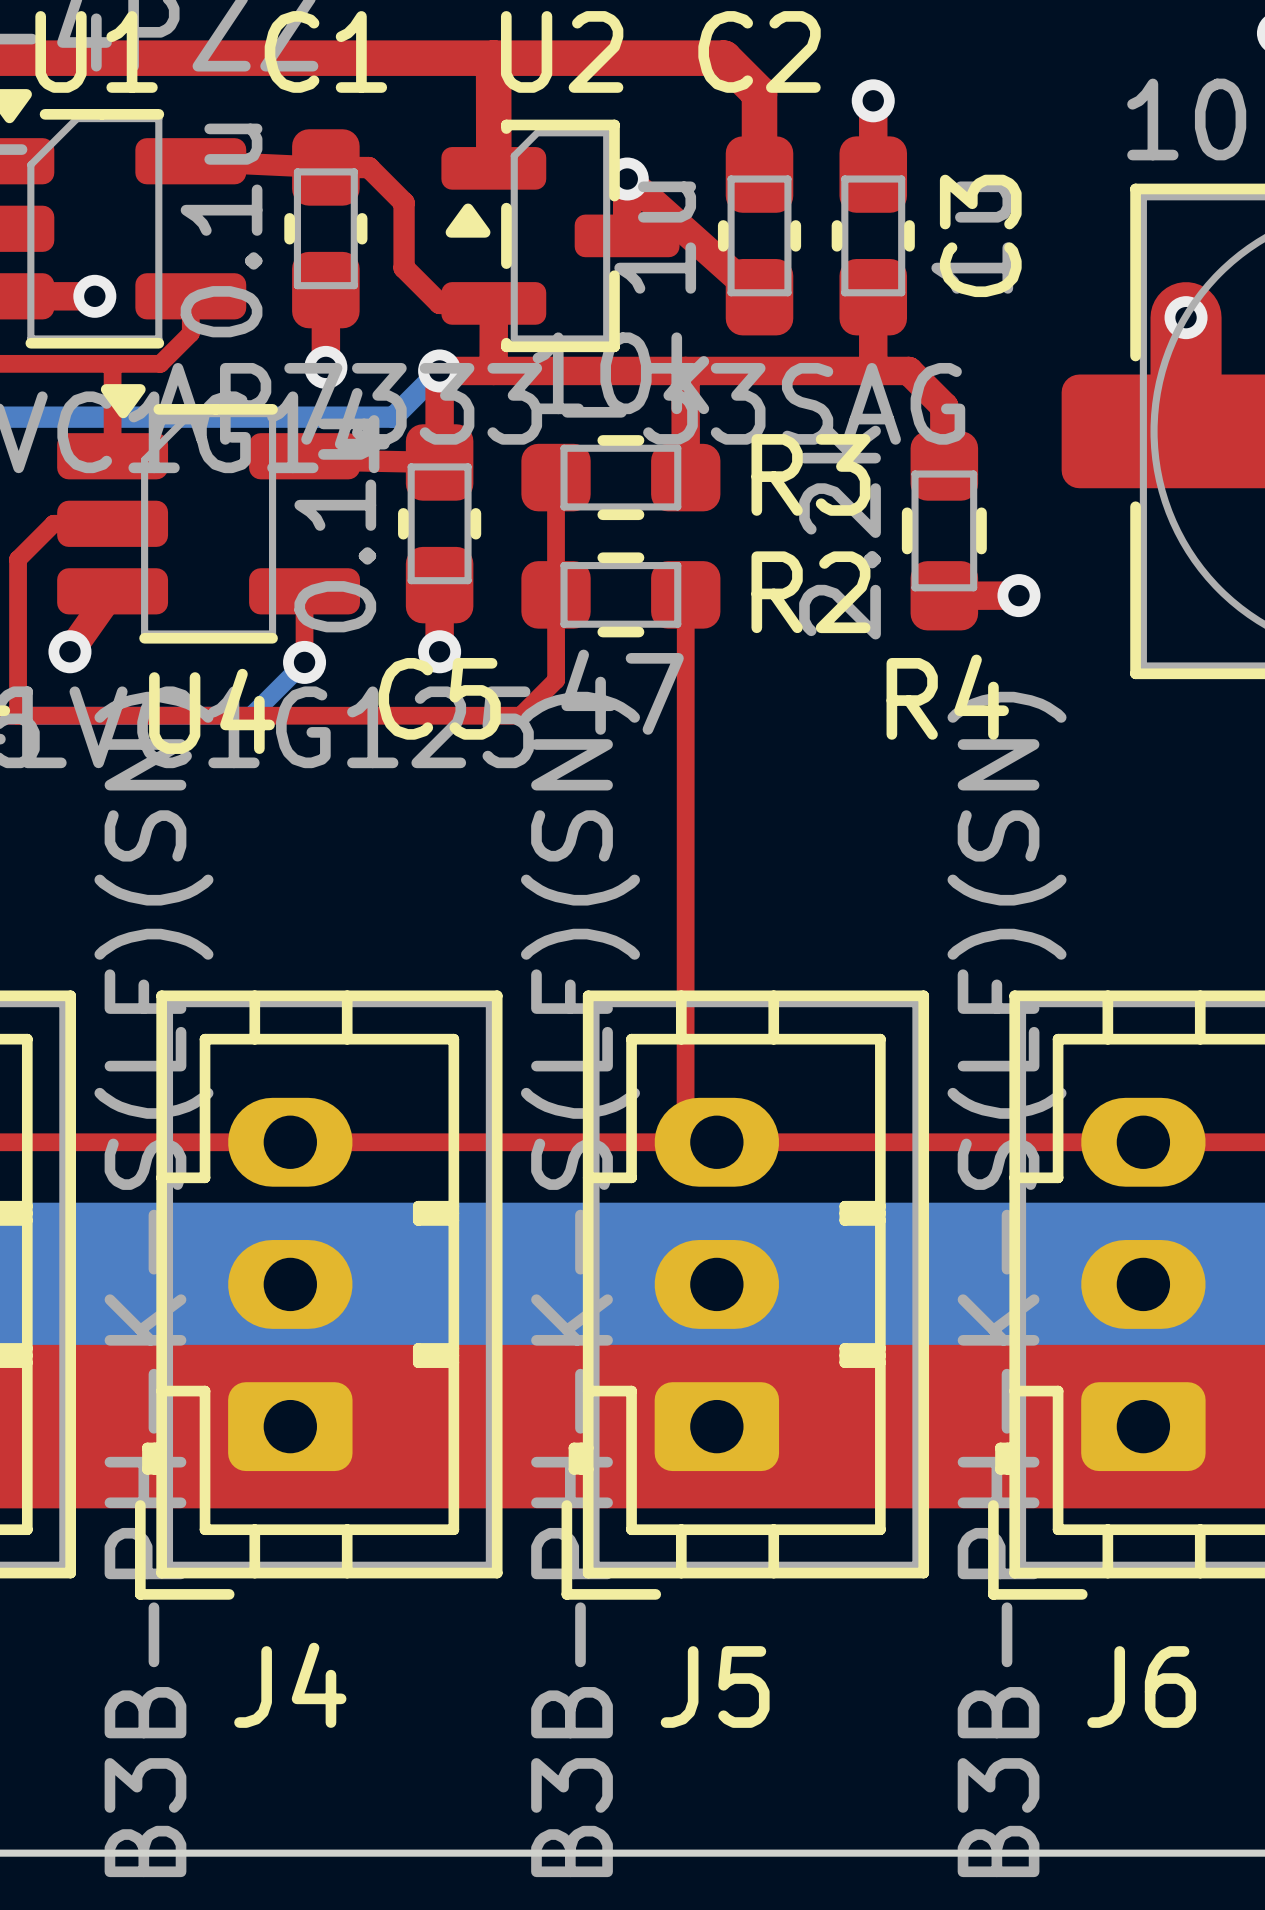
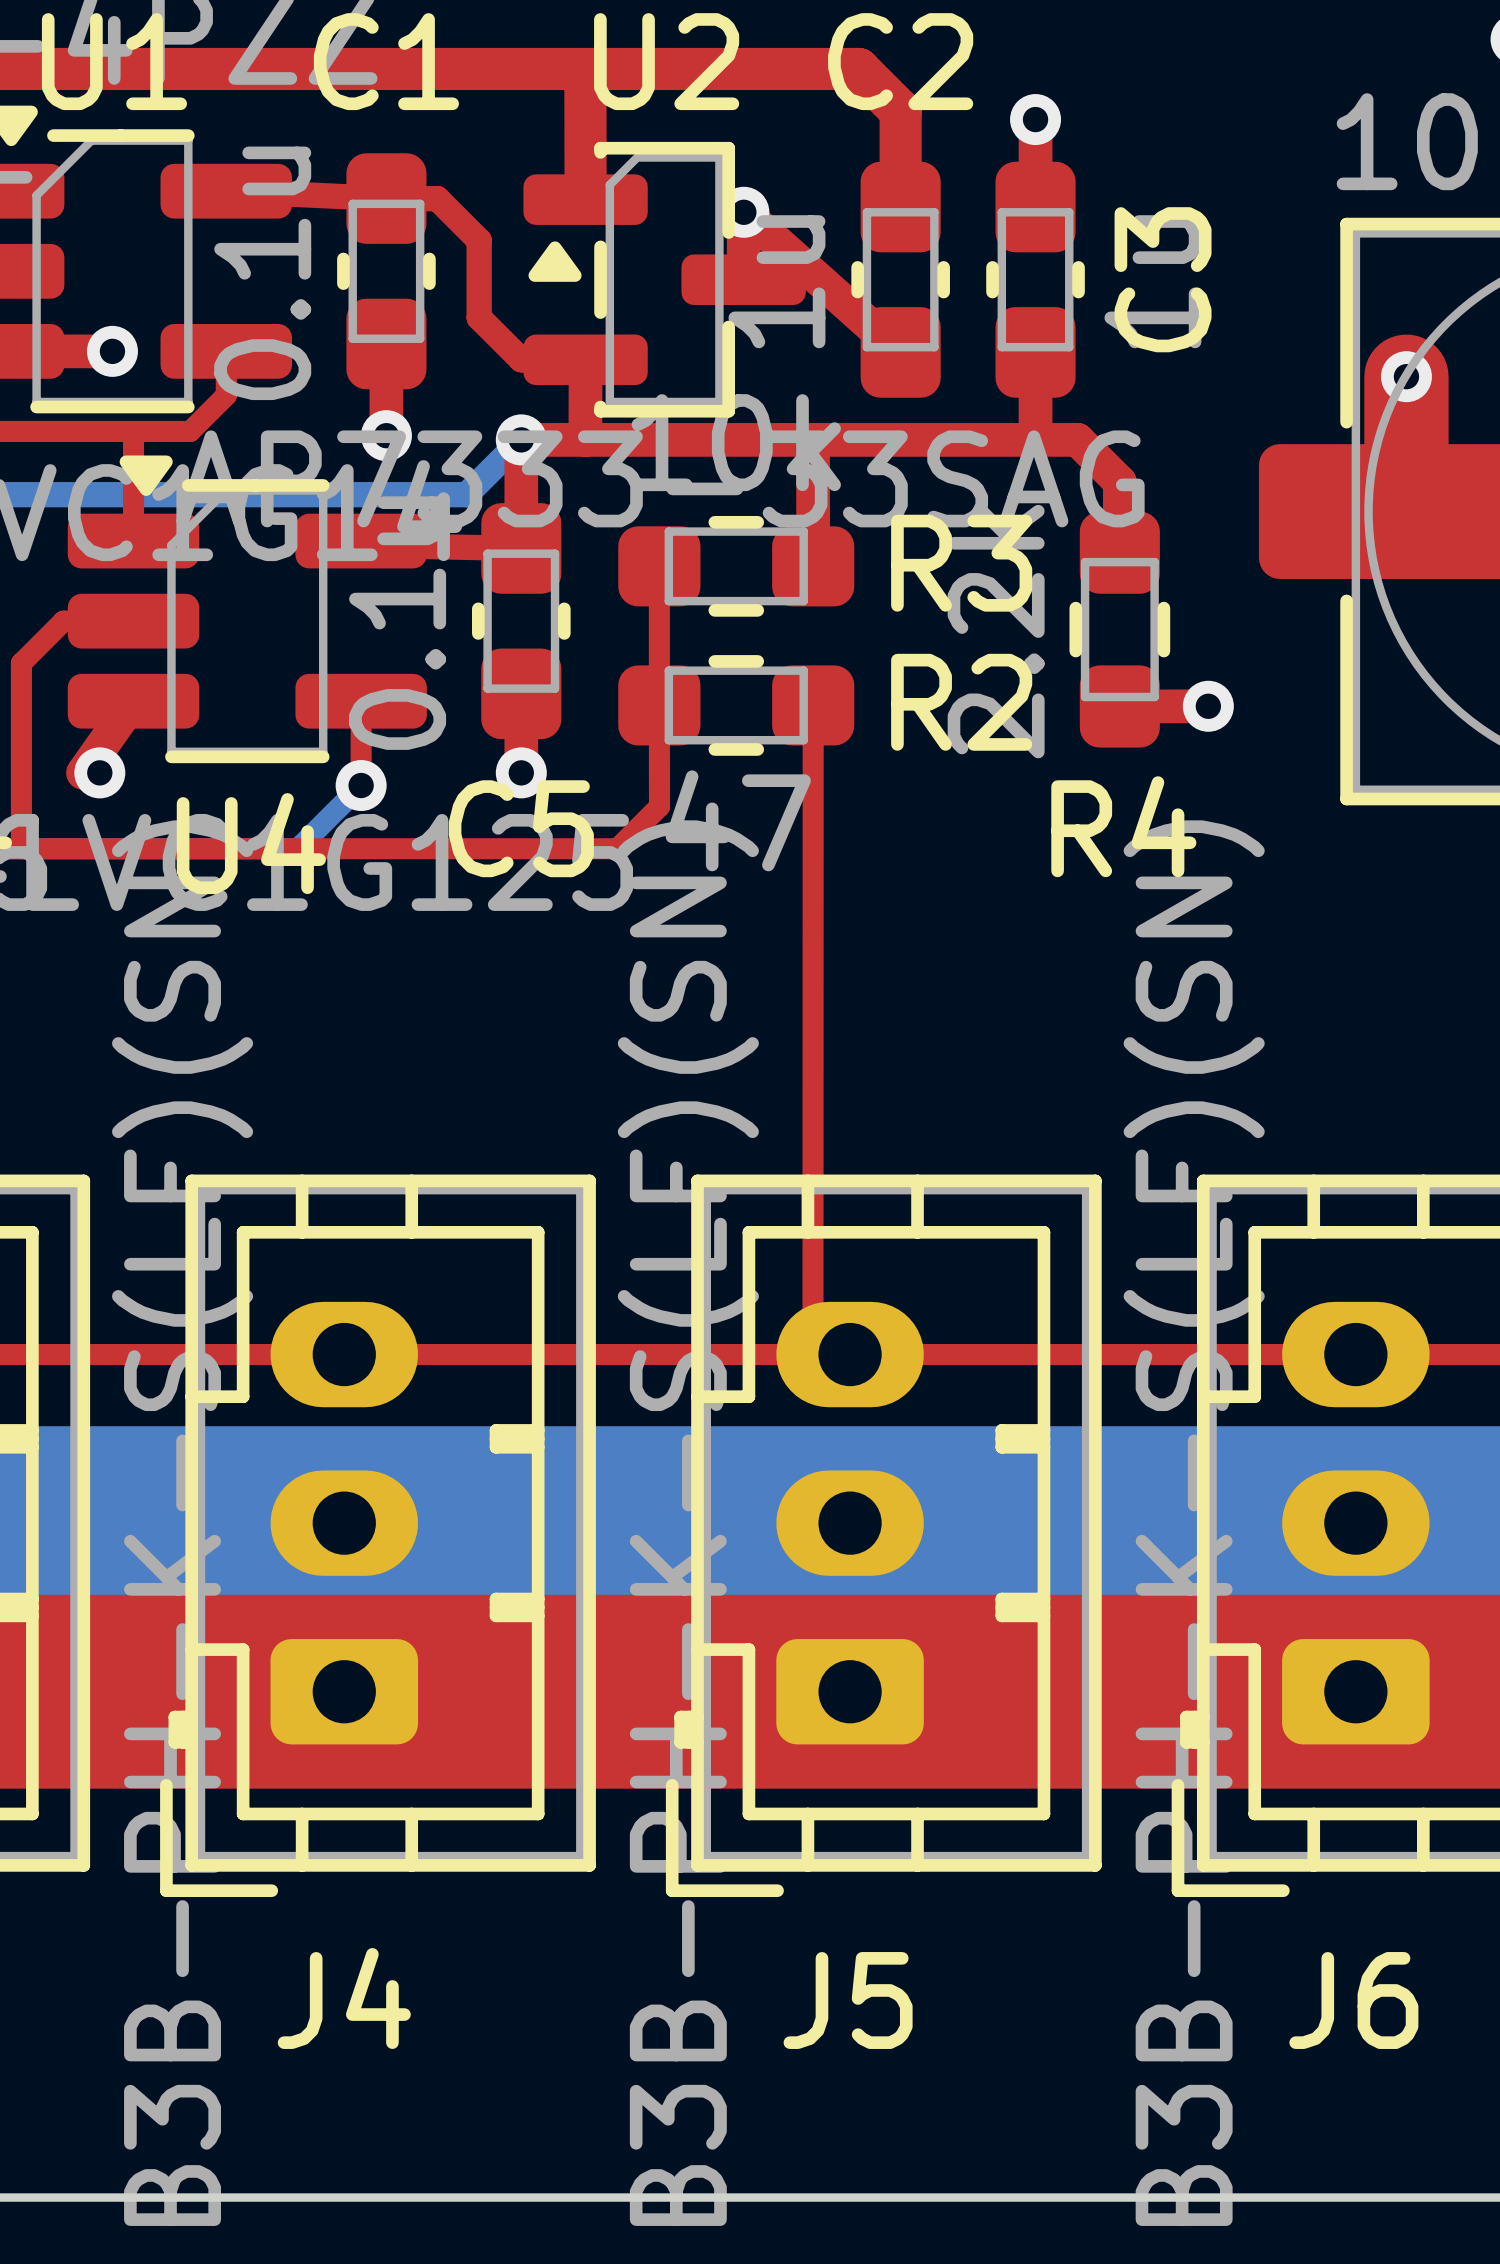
via position: (69, 651) -> (99, 772)

